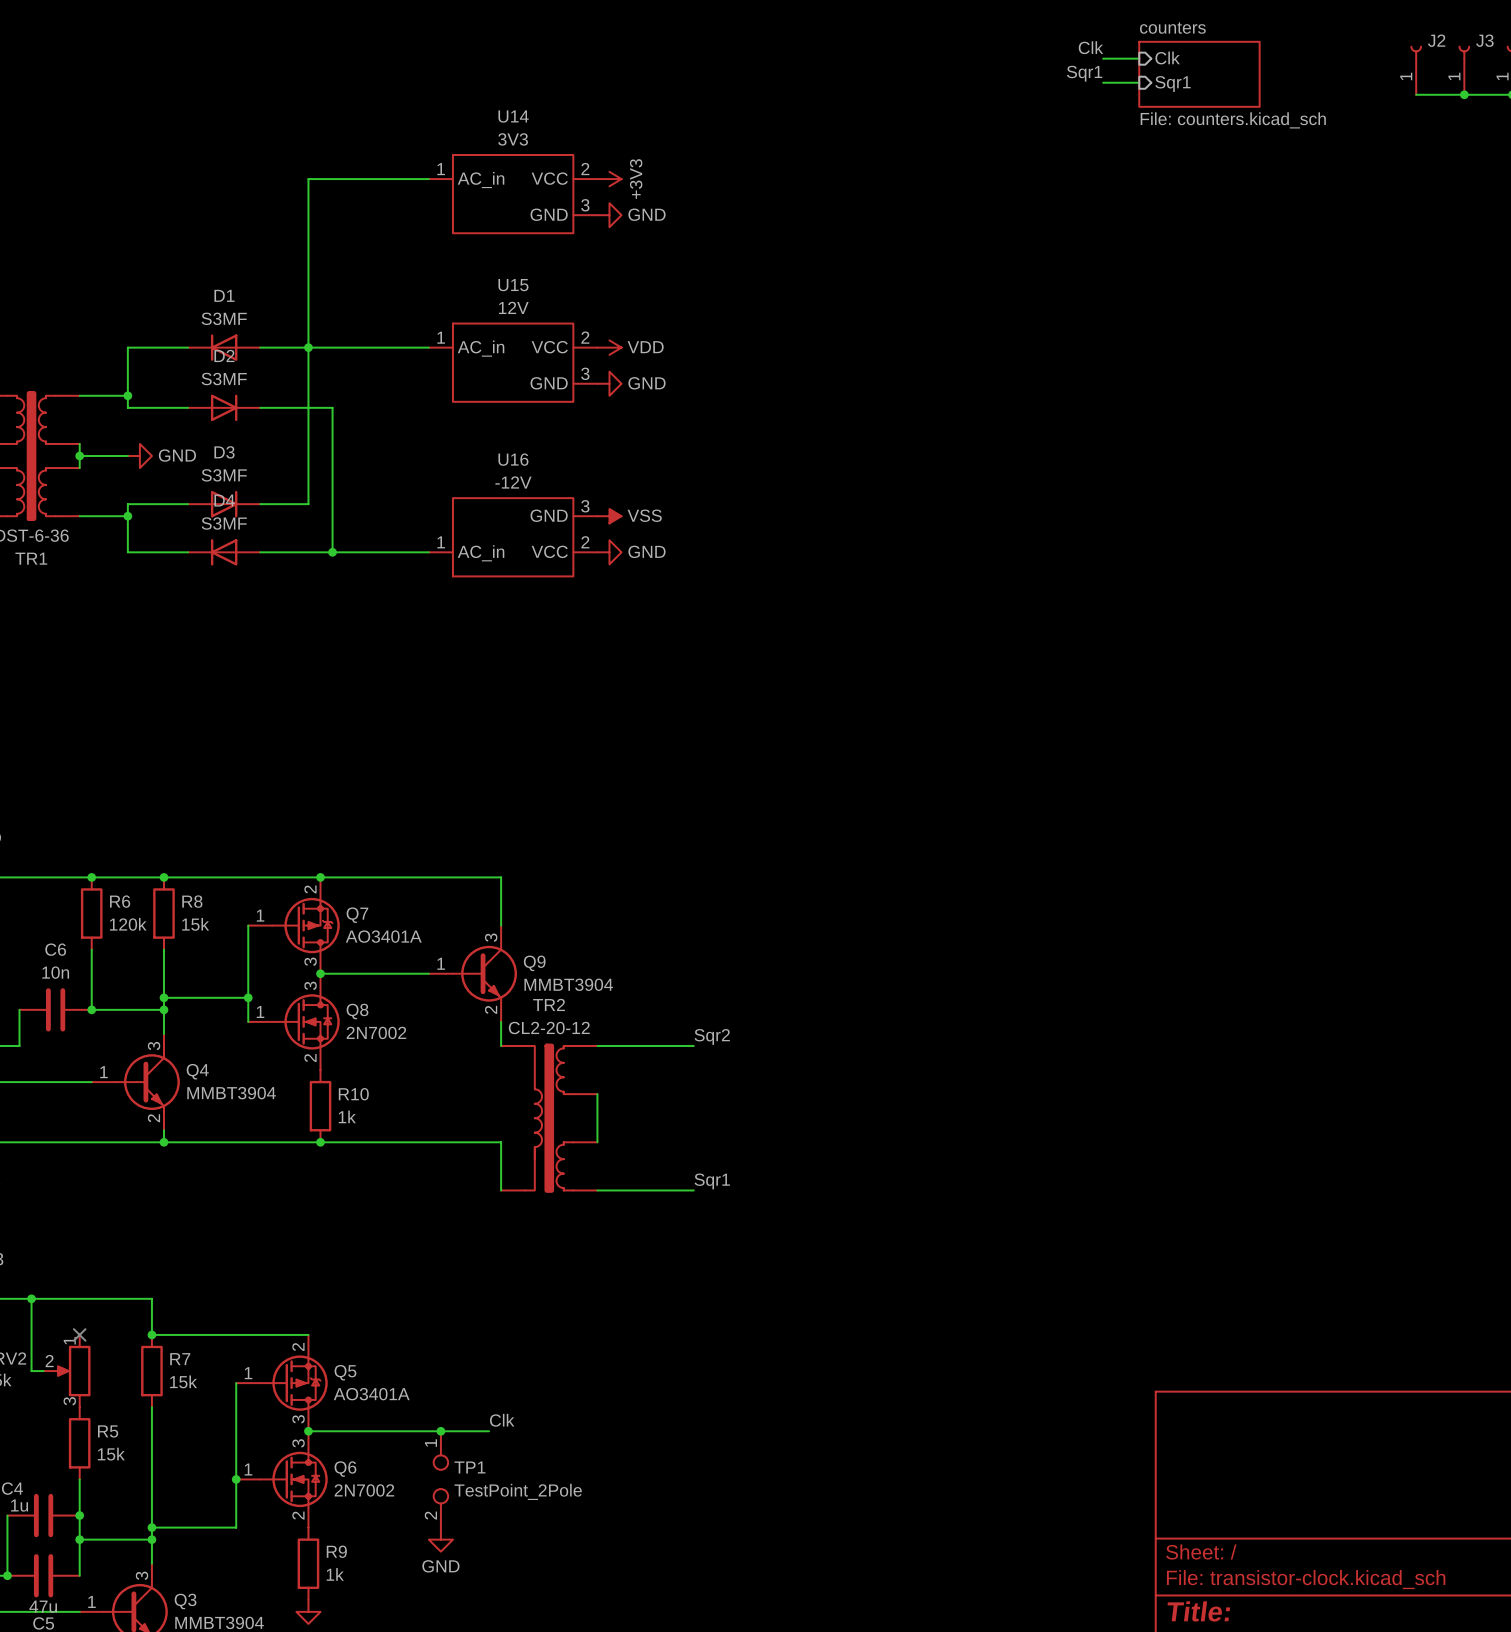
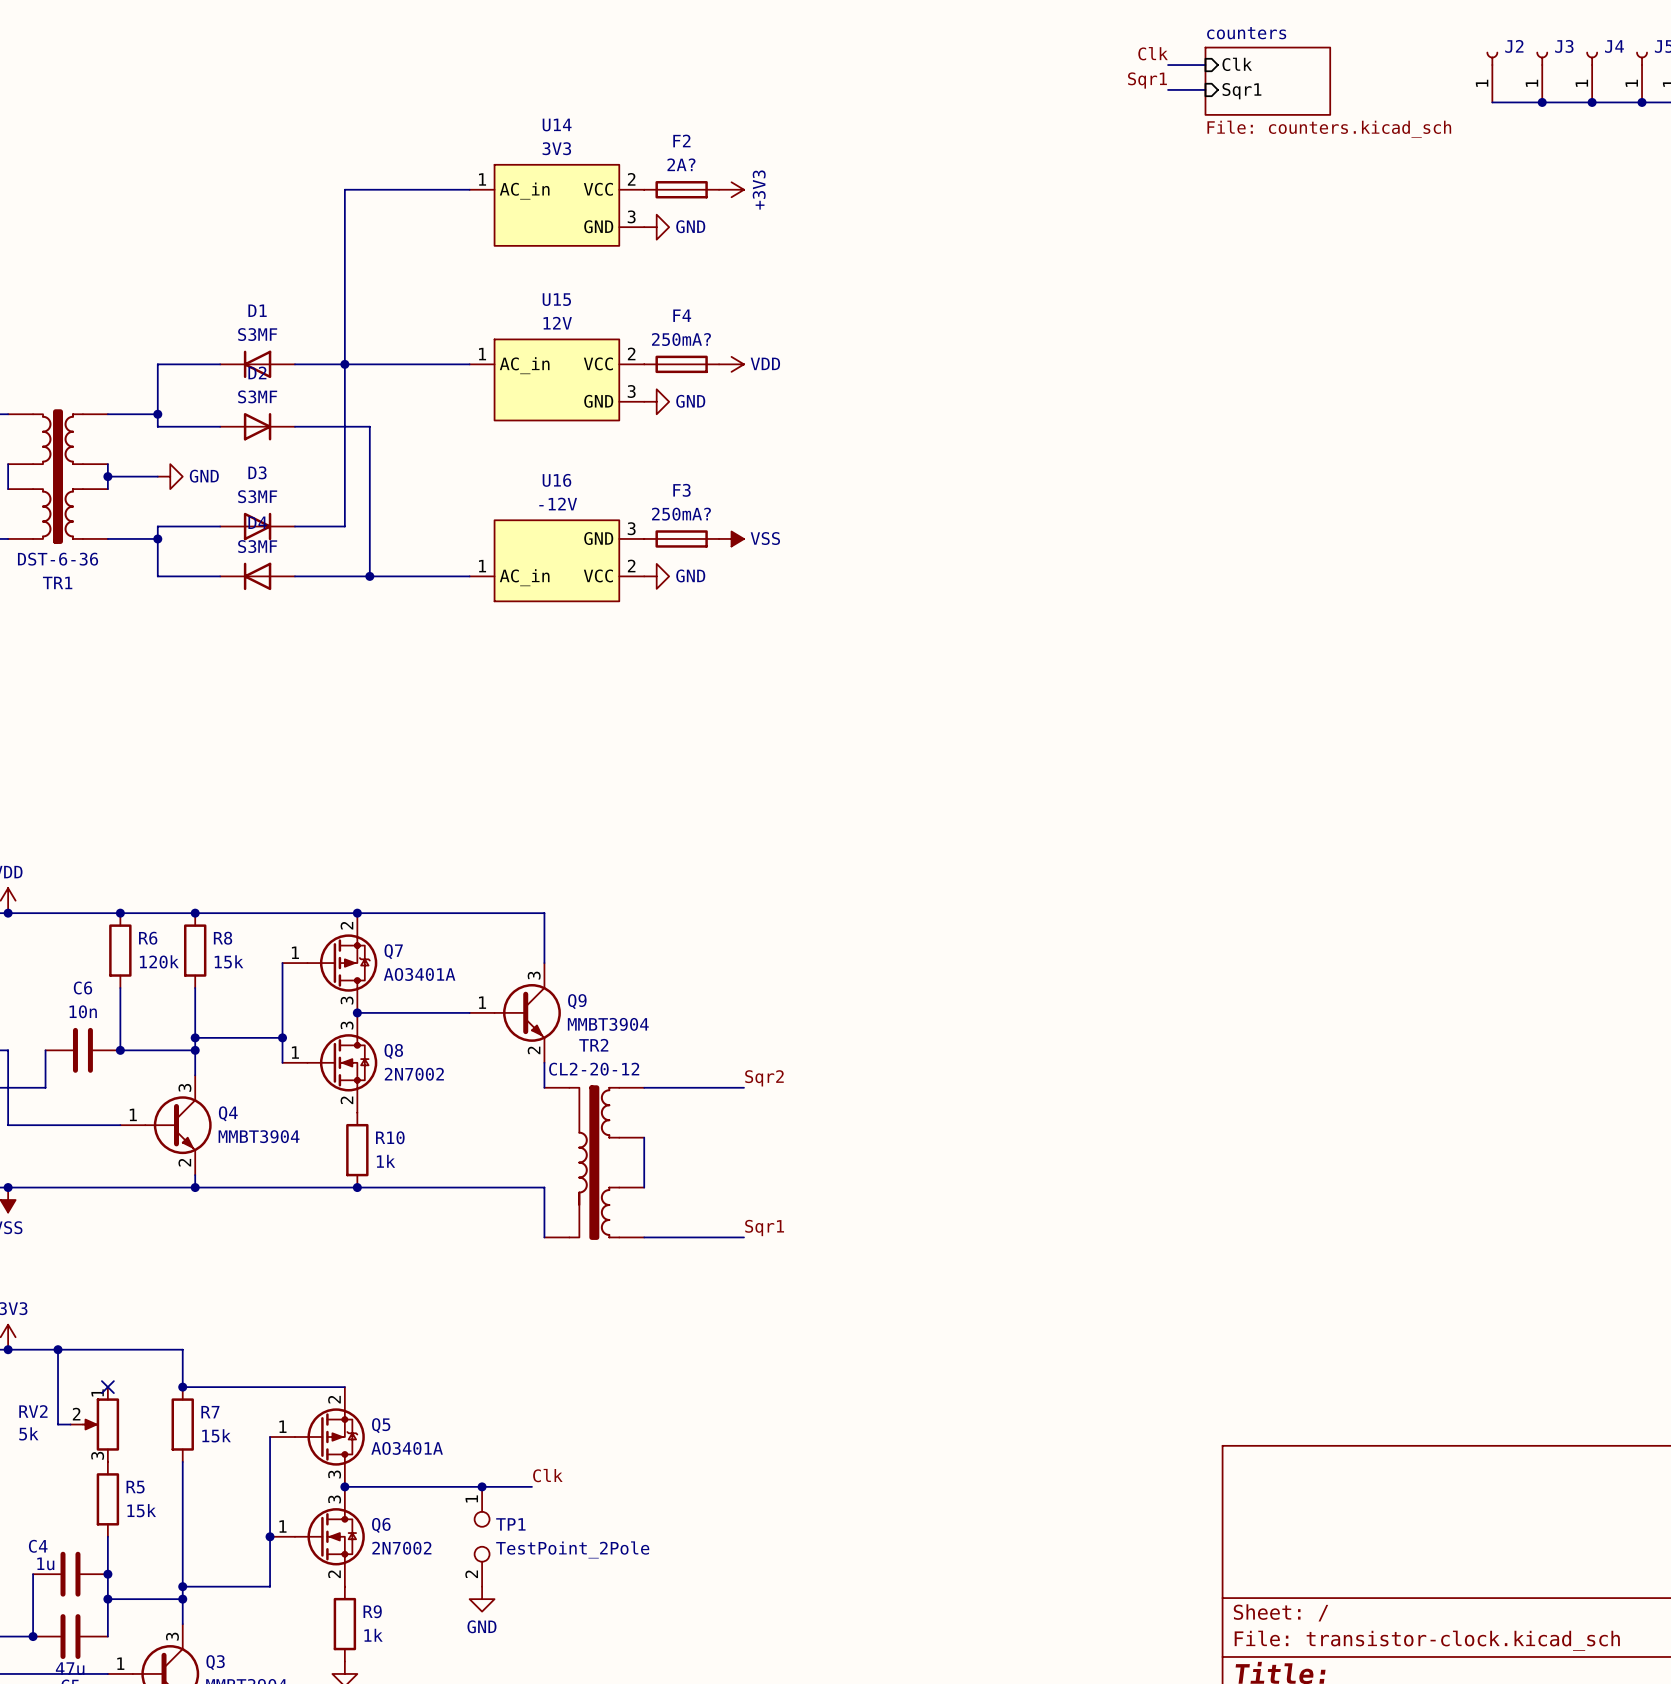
power symbol position: +3V3 (609, 179) -> +3V3 (731, 189)
F2: none -> 2A? (681, 189)
power symbol position: VDD (609, 347) -> VDD (731, 364)
F4: none -> 250mA? (681, 364)
power symbol position: VSS (609, 516) -> VSS (731, 538)
F3: none -> 250mA? (681, 538)

